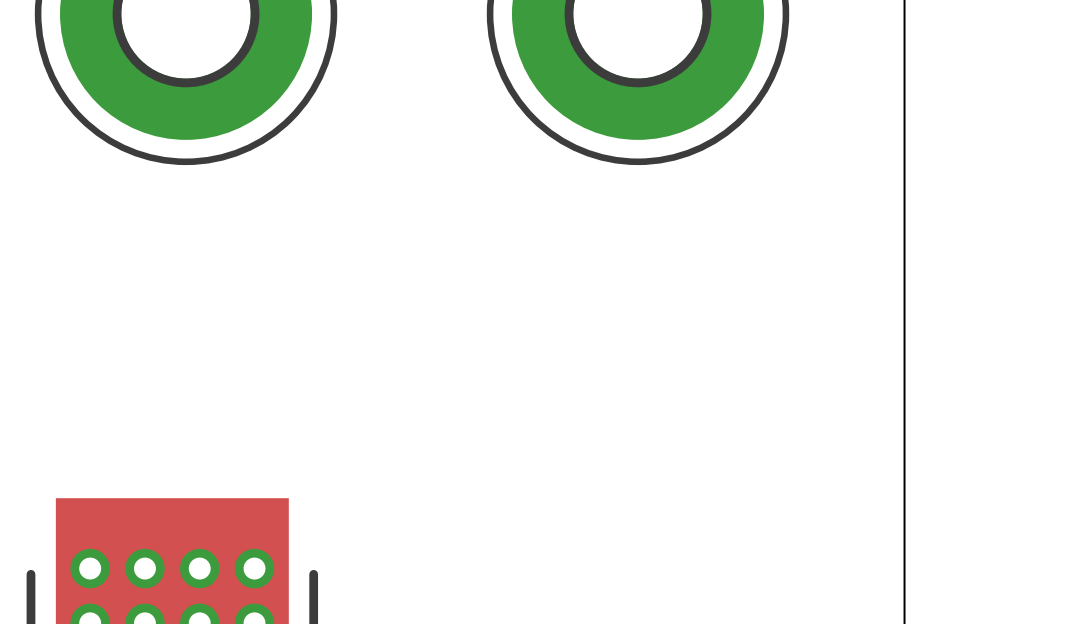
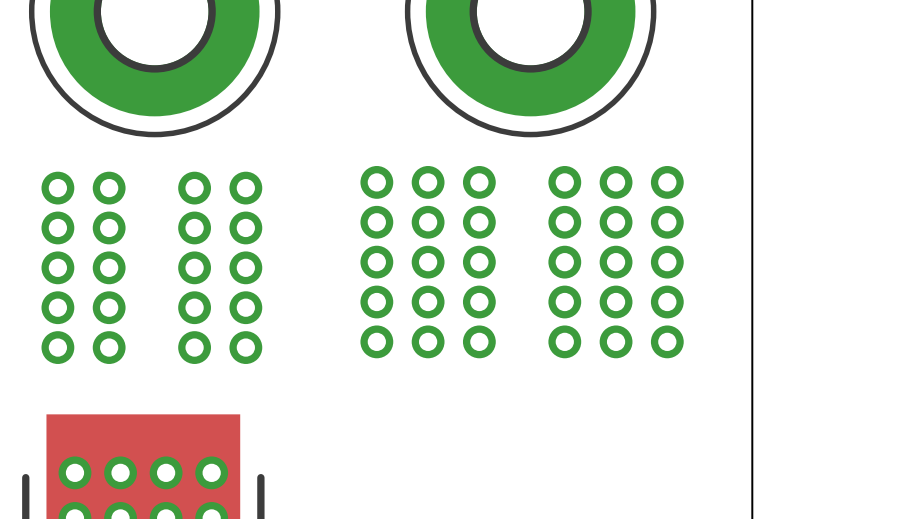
via: none -> (376, 182)
via: none -> (428, 182)
via: none -> (479, 182)
via: none -> (564, 182)
via: none -> (616, 182)
via: none -> (667, 182)
via: none -> (57, 188)
via: none -> (109, 188)
via: none -> (194, 188)
via: none -> (245, 188)
via: none -> (376, 222)
via: none -> (428, 222)
via: none -> (479, 222)
via: none -> (564, 222)
via: none -> (616, 222)
via: none -> (667, 222)
via: none -> (57, 227)
via: none -> (109, 227)
via: none -> (194, 227)
via: none -> (245, 227)
via: none -> (376, 262)
via: none -> (428, 262)
via: none -> (479, 262)
via: none -> (564, 262)
via: none -> (616, 262)
via: none -> (667, 262)
via: none -> (57, 267)
via: none -> (109, 267)
via: none -> (194, 267)
via: none -> (245, 267)
via: none -> (376, 302)
via: none -> (428, 302)
via: none -> (479, 302)
via: none -> (564, 302)
via: none -> (616, 302)
via: none -> (667, 302)
via: none -> (57, 307)
via: none -> (109, 307)
via: none -> (194, 307)
via: none -> (245, 307)
via: none -> (376, 341)
via: none -> (428, 341)
via: none -> (479, 341)
via: none -> (564, 341)
via: none -> (616, 341)
via: none -> (667, 341)
via: none -> (57, 347)
via: none -> (109, 347)
via: none -> (194, 347)
via: none -> (245, 347)

